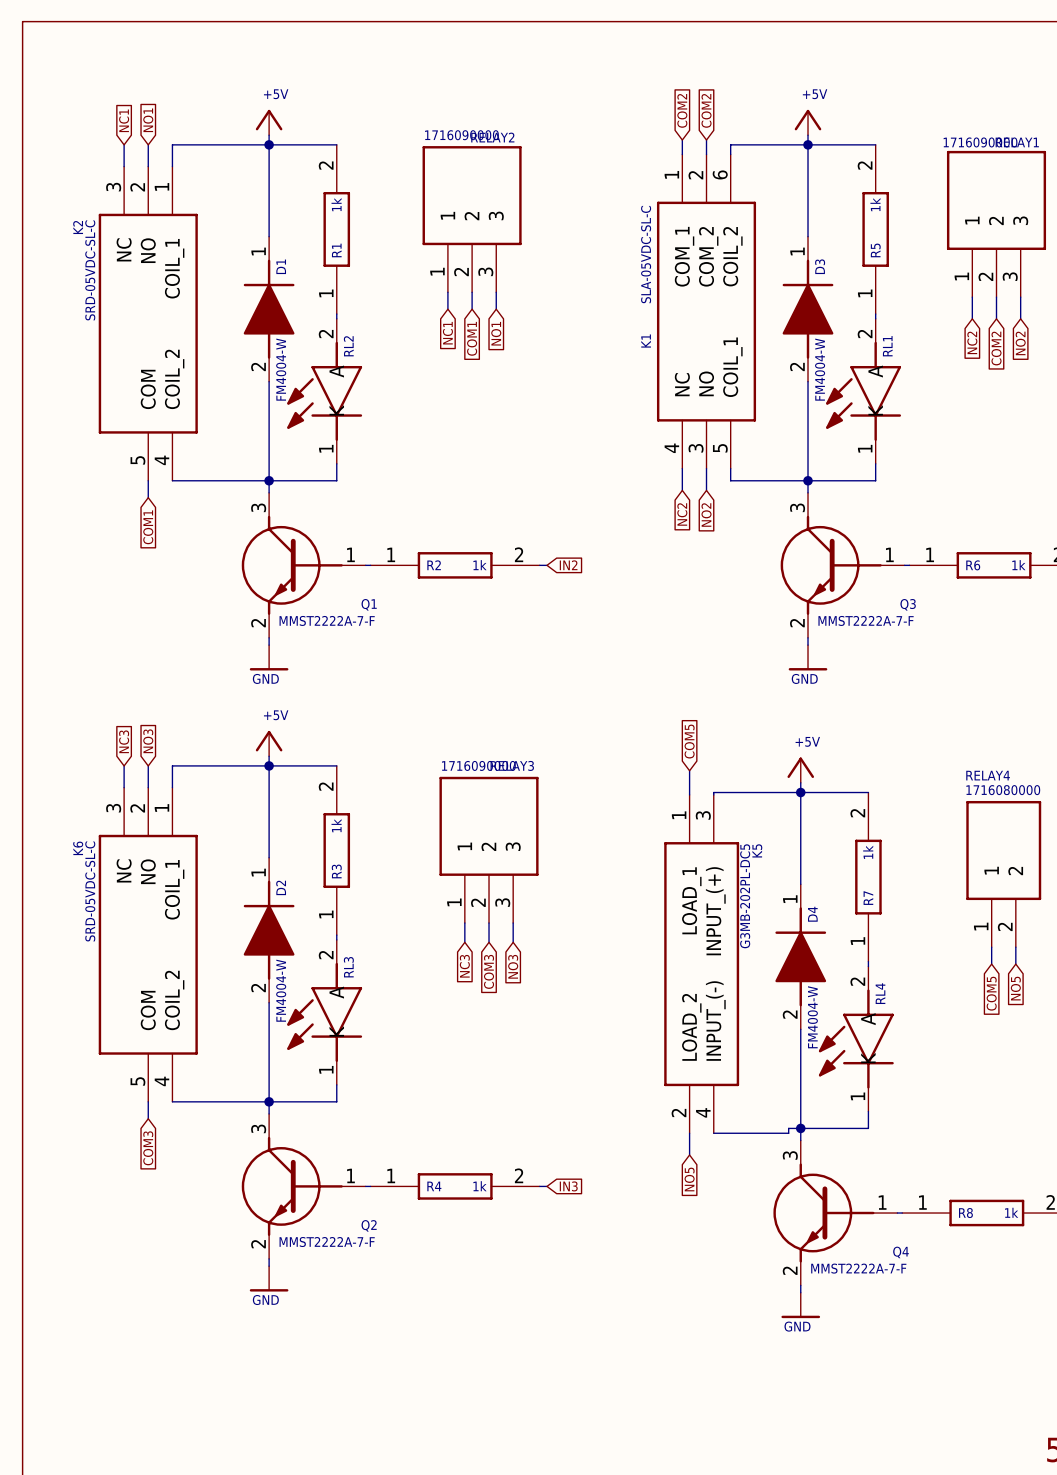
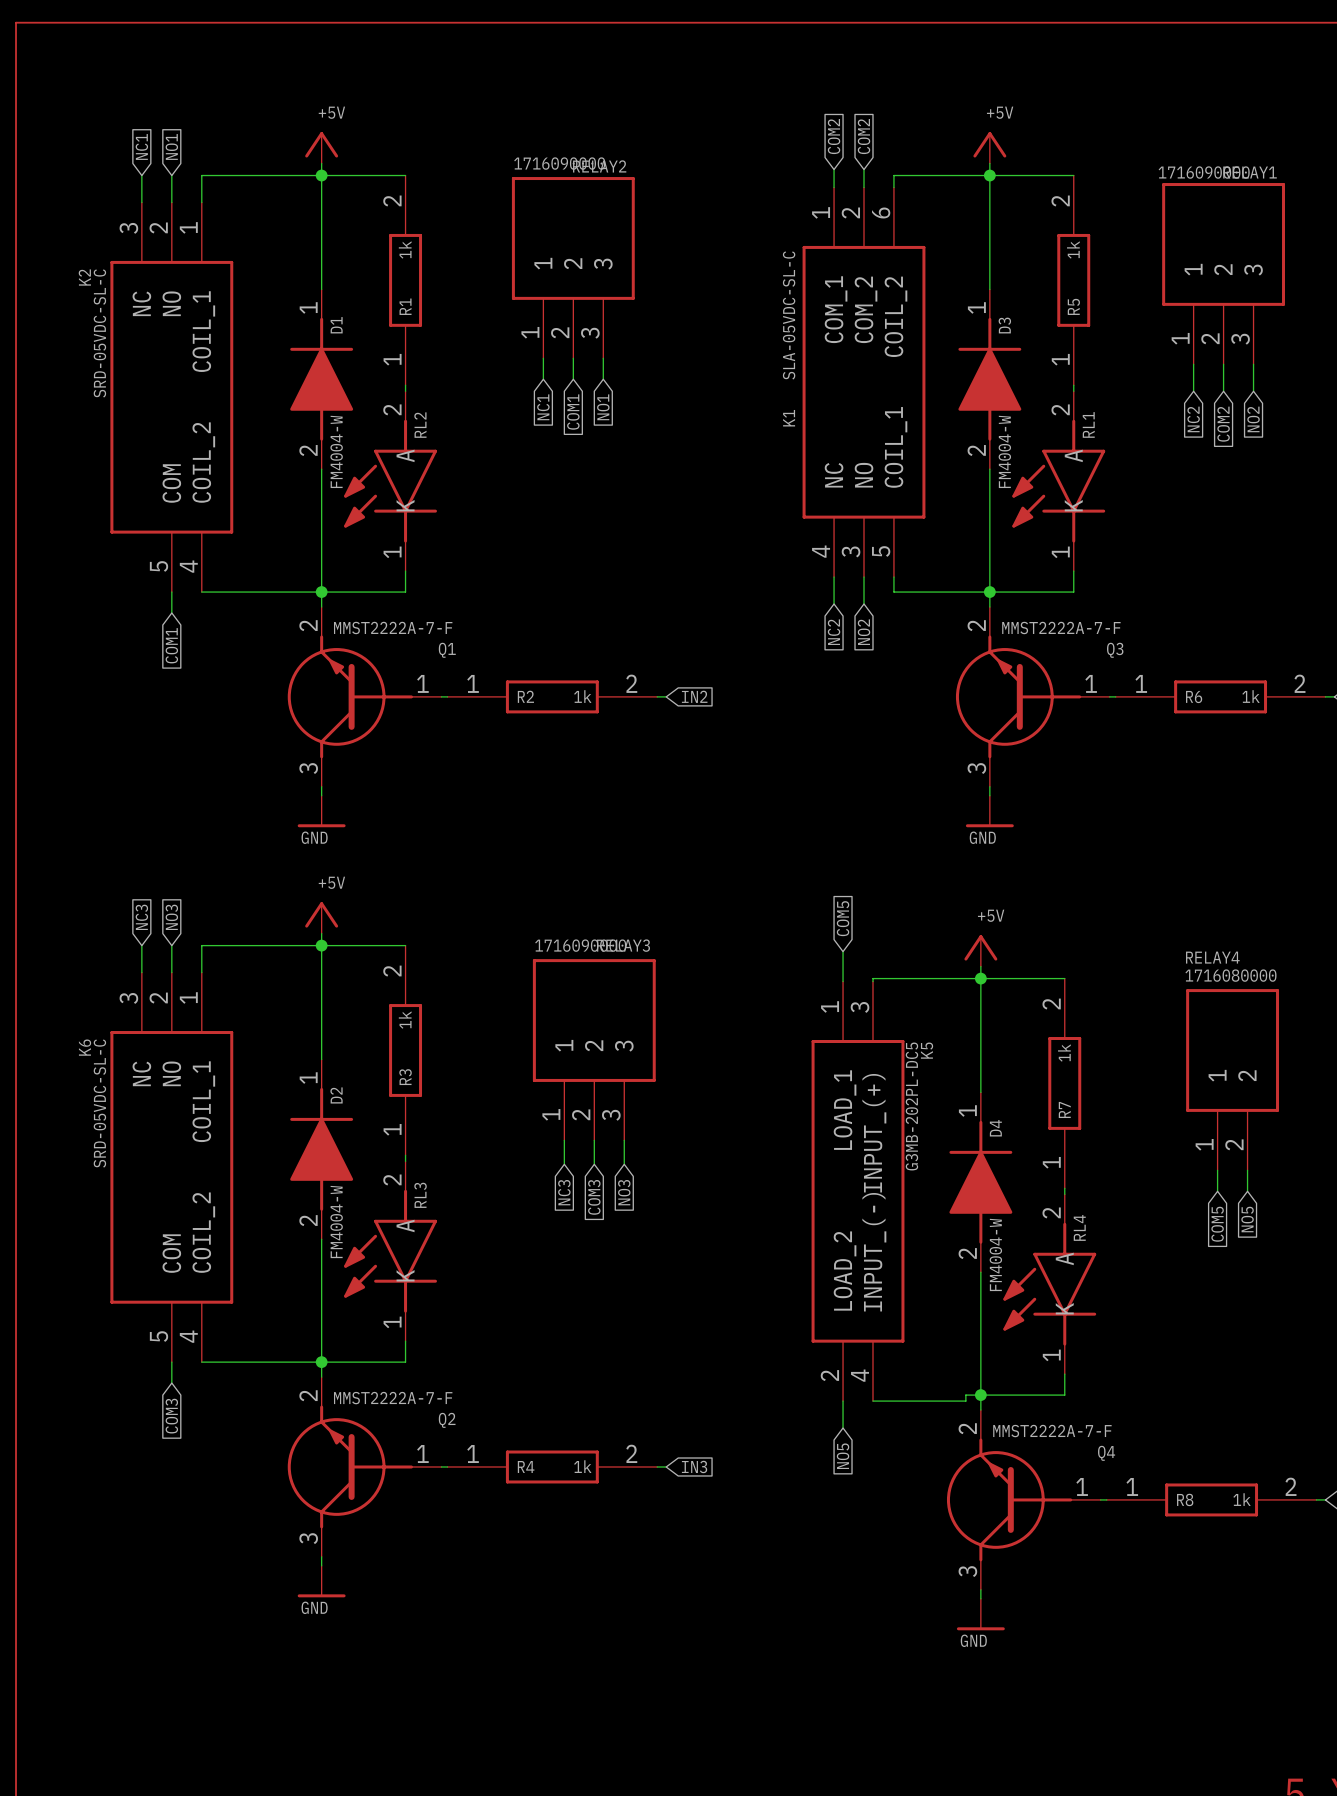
Q1 flip: as is (292, 565) -> up-down (350, 696)
Q3 flip: as is (831, 565) -> up-down (1018, 696)
Q2 flip: as is (292, 1186) -> up-down (350, 1466)
Q4 flip: as is (823, 1213) -> up-down (1009, 1499)

